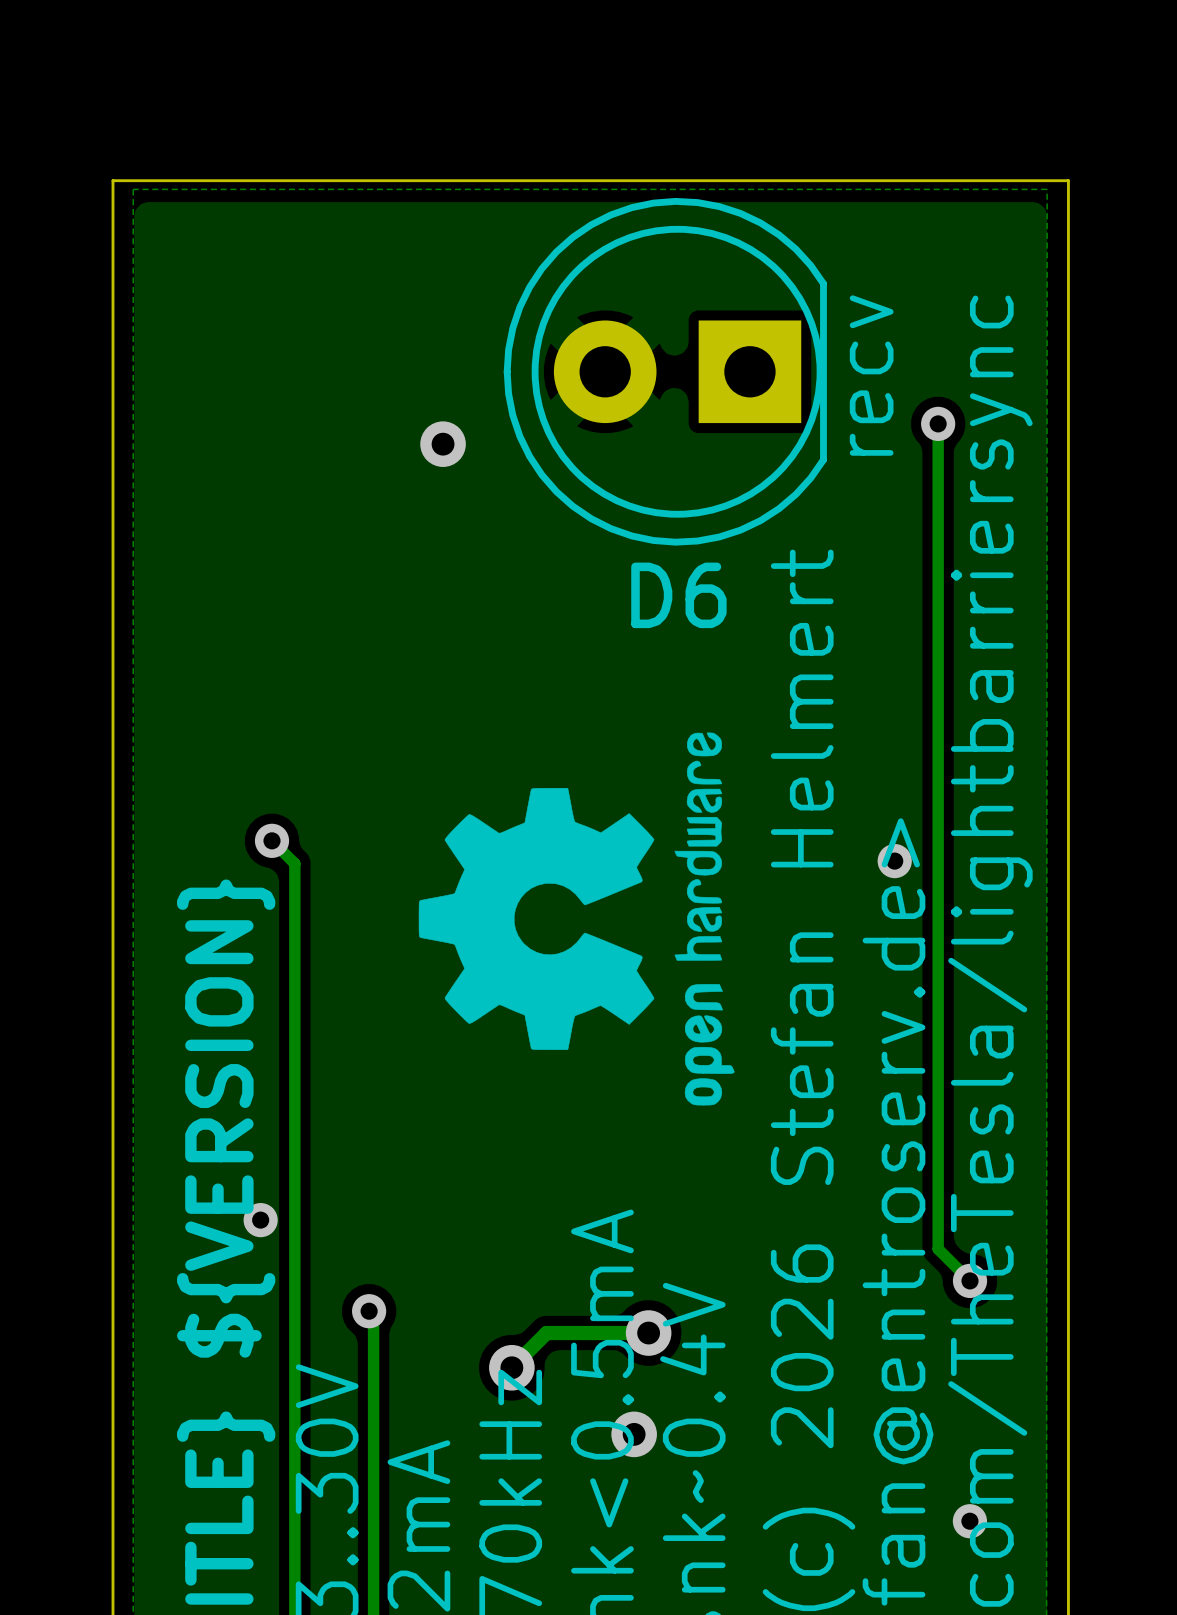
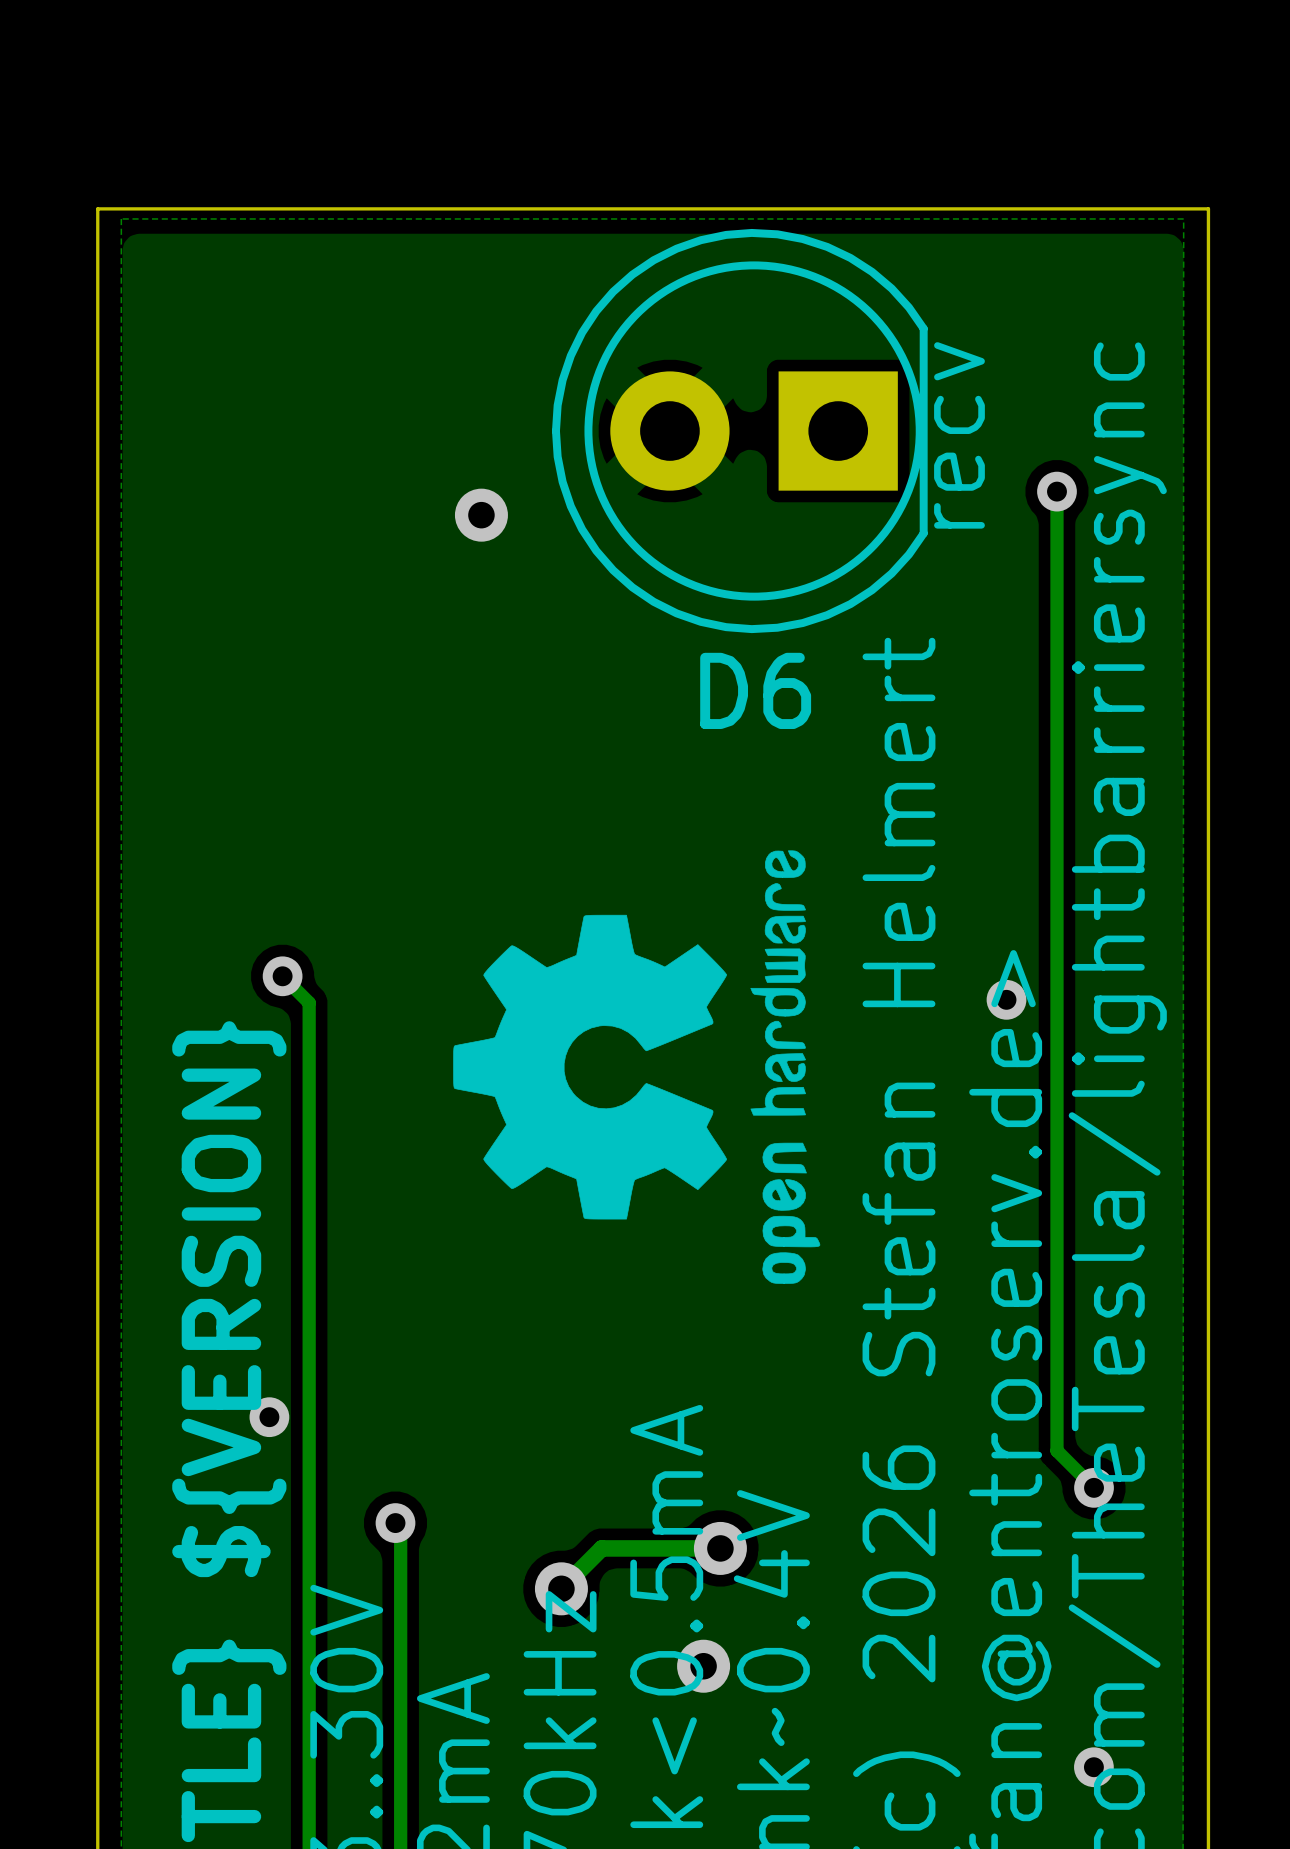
text position: recv (871, 375) -> recv (959, 435)

